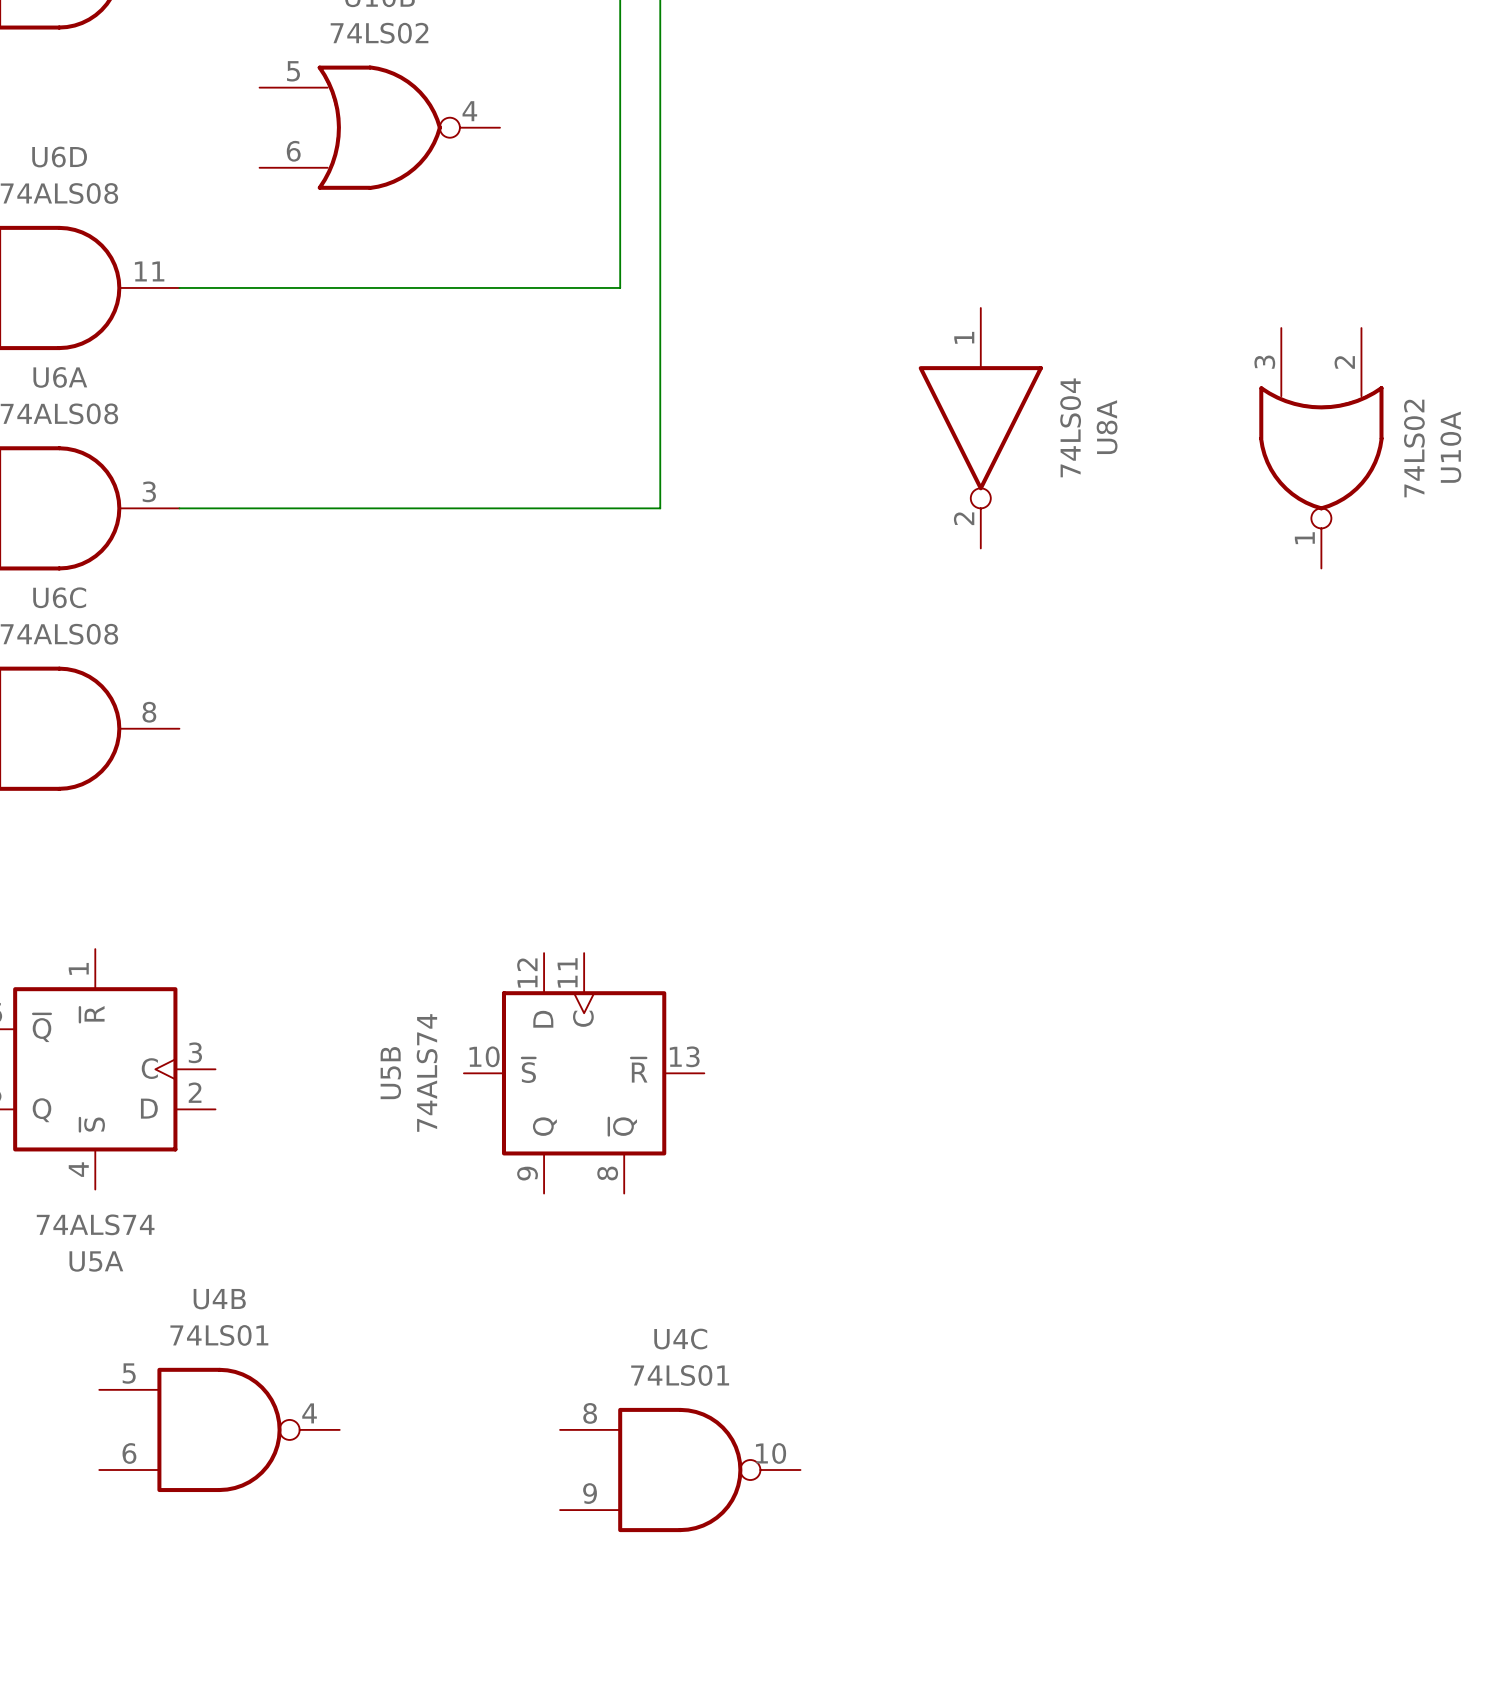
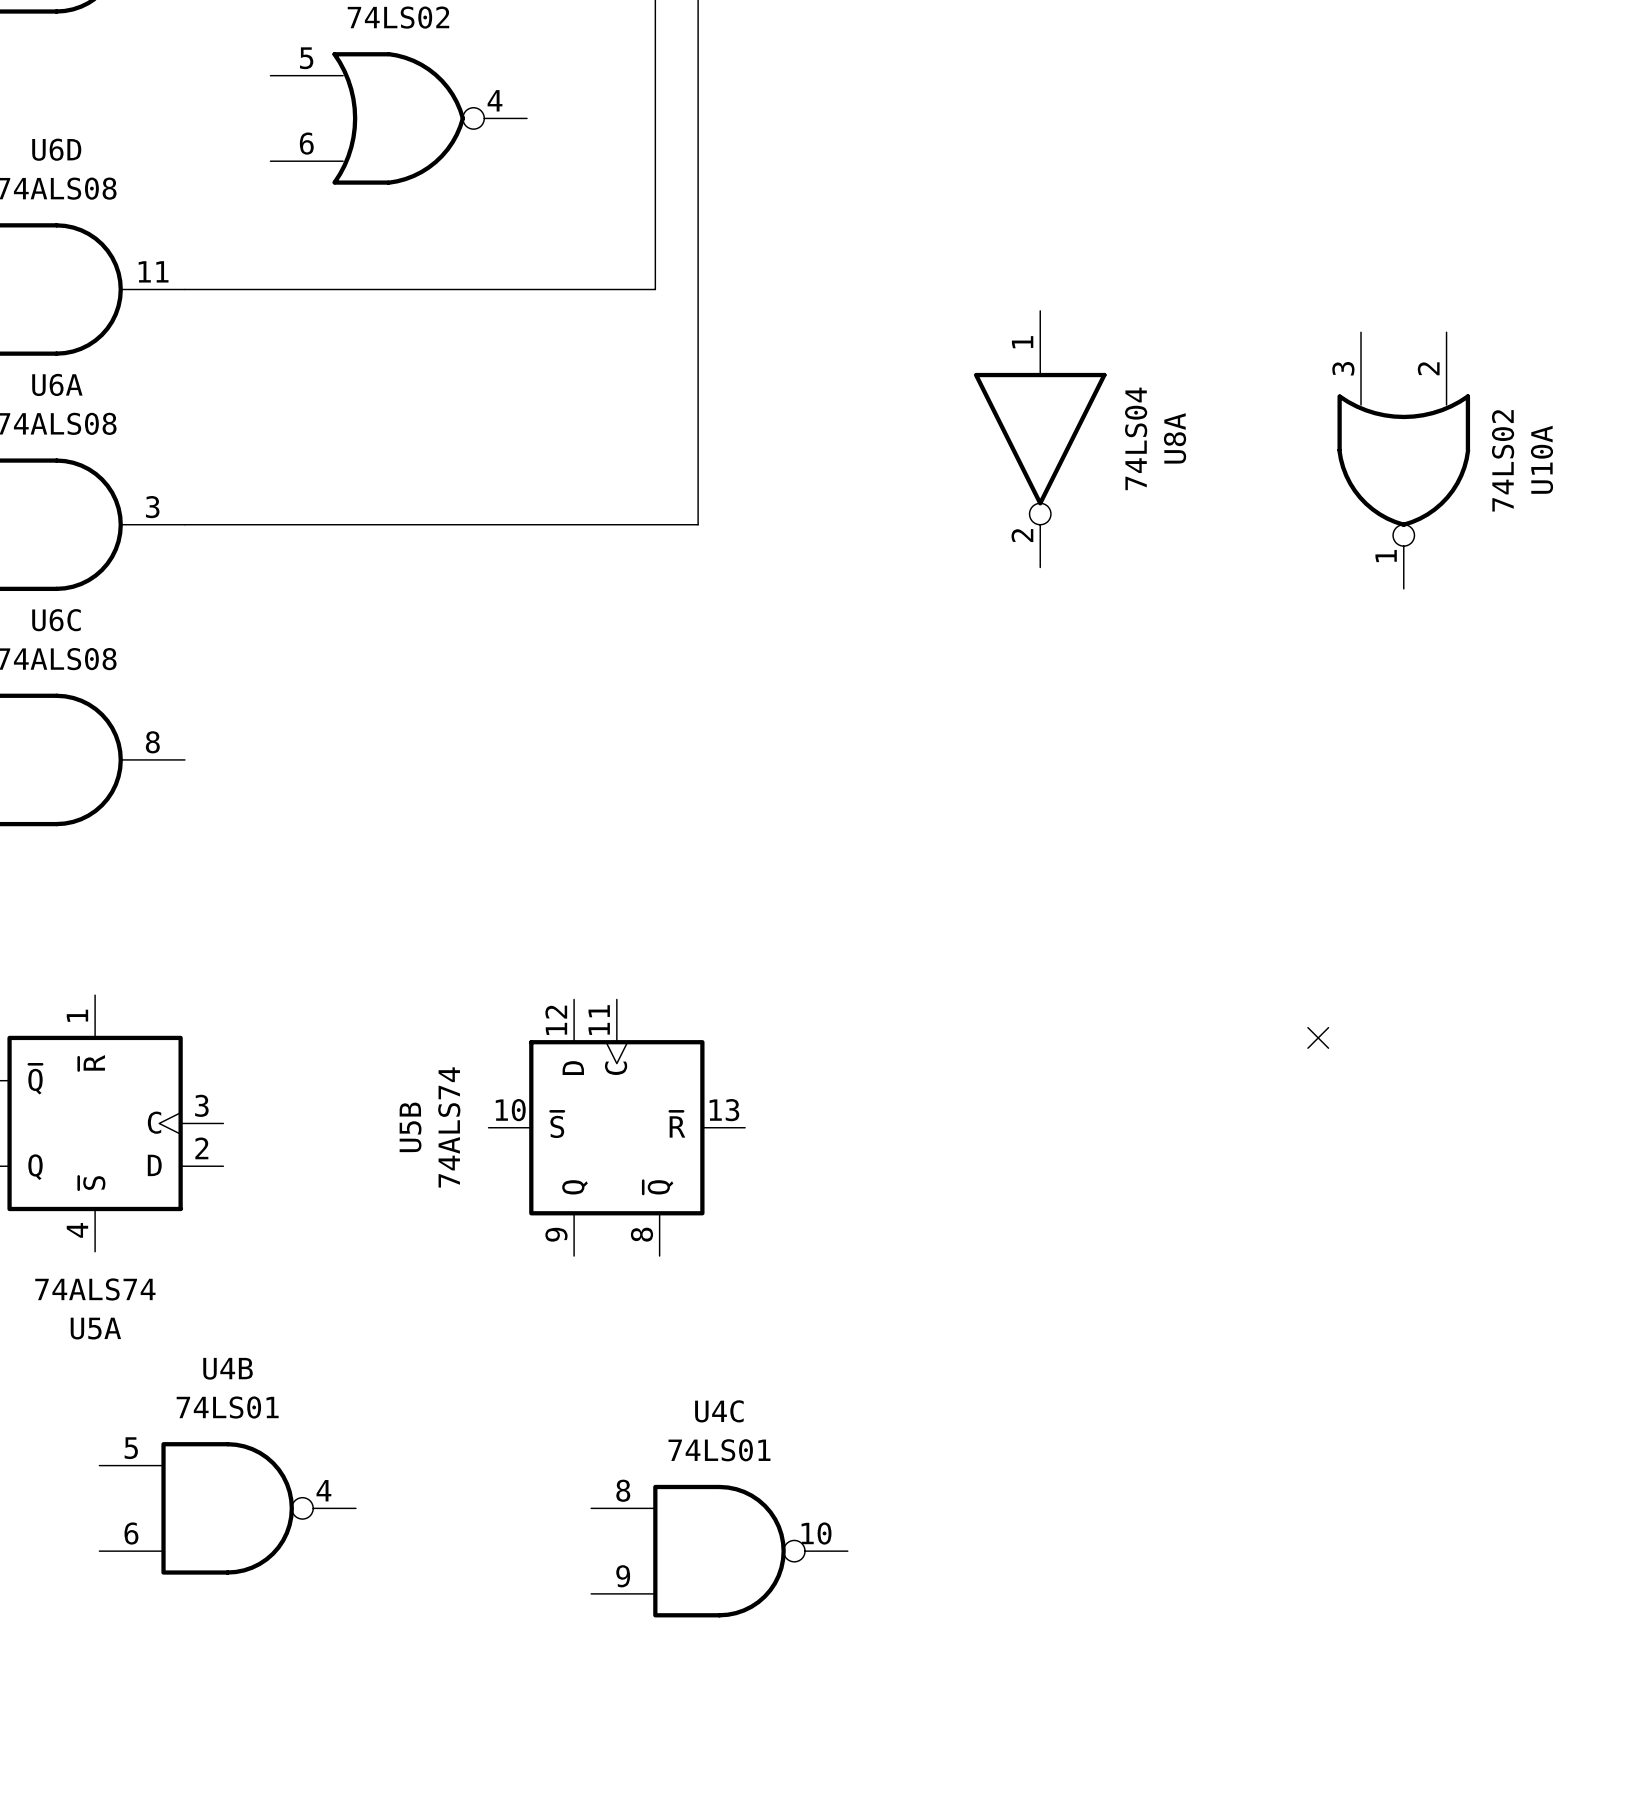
no-connect mark: none -> (1318, 1037)

